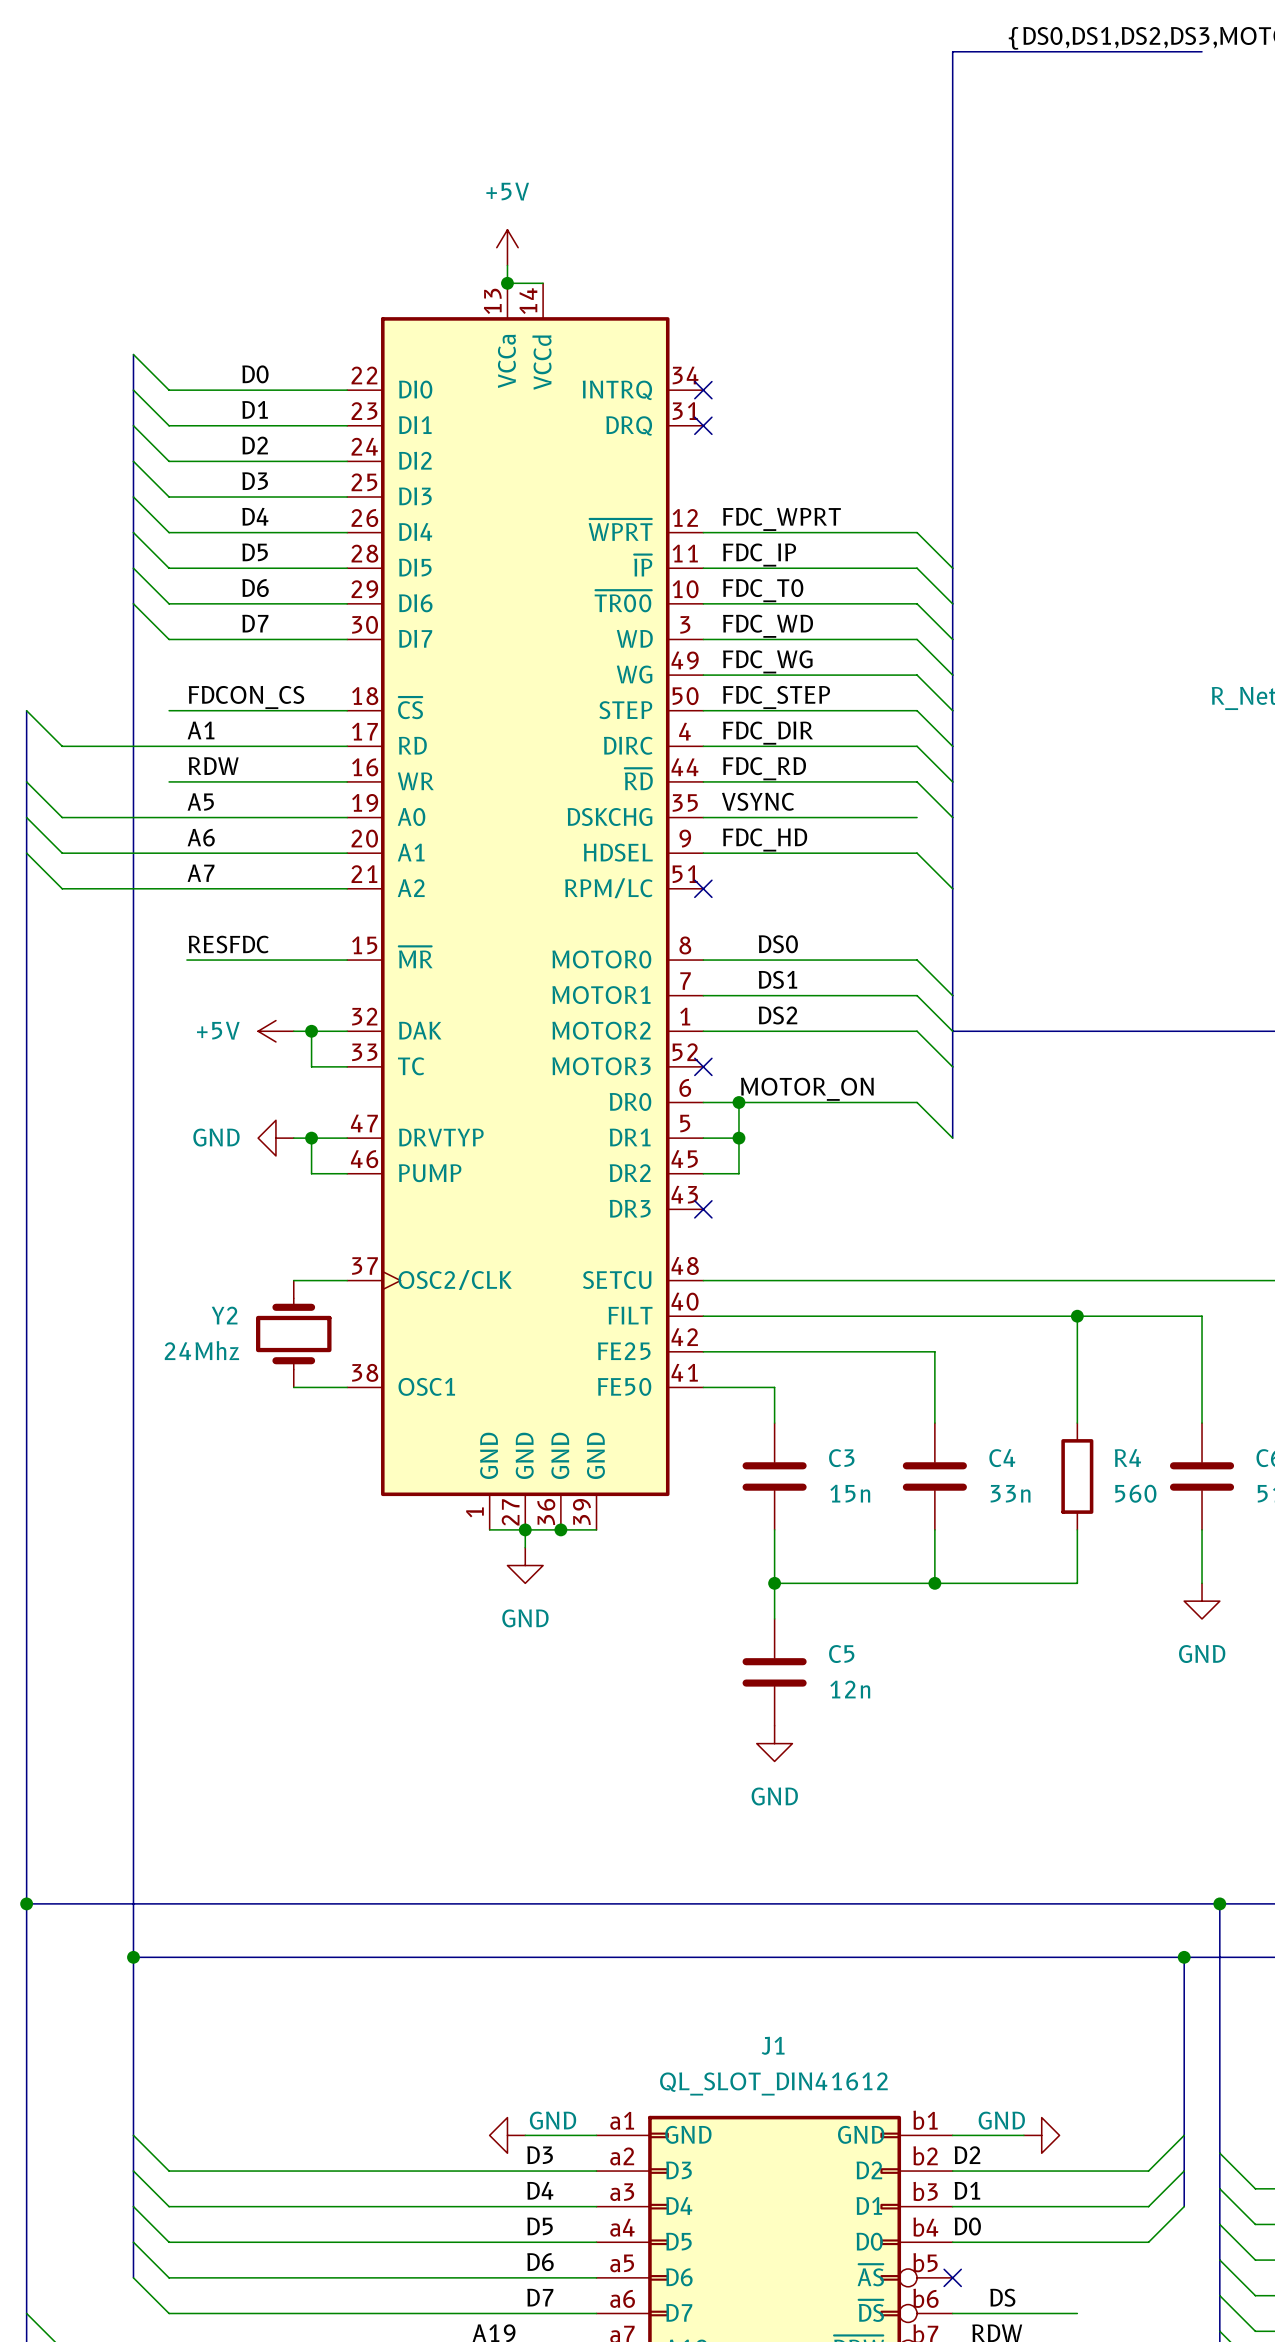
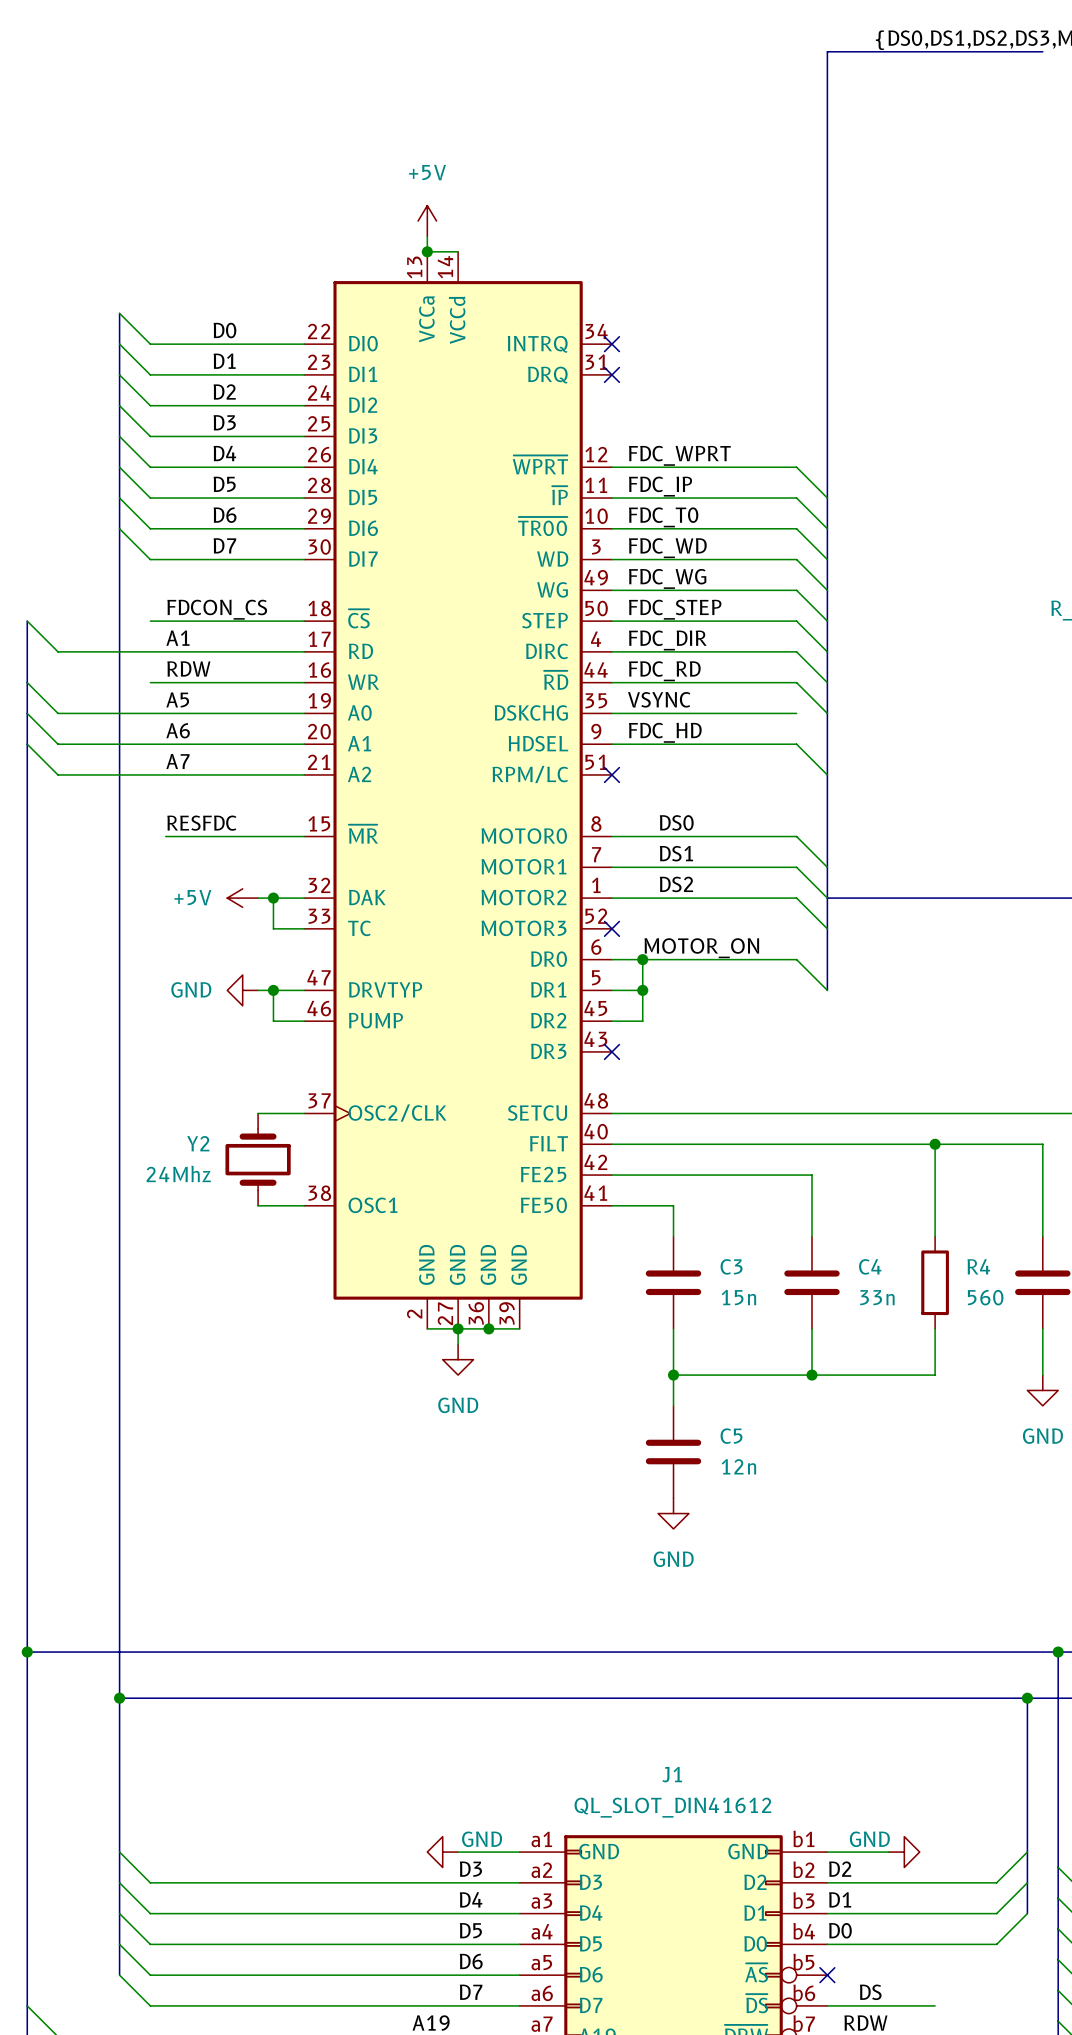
power symbol position: +5V (507, 247) -> +5V (427, 221)
wire: (507, 265) (507, 283) -> (427, 236) (427, 251) (442, 251)
part symbol: [347, 283, 704, 1530] -> [304, 251, 612, 1329]
junction position: (507, 283) -> (427, 251)
wire: (525, 283) (543, 283) -> none

